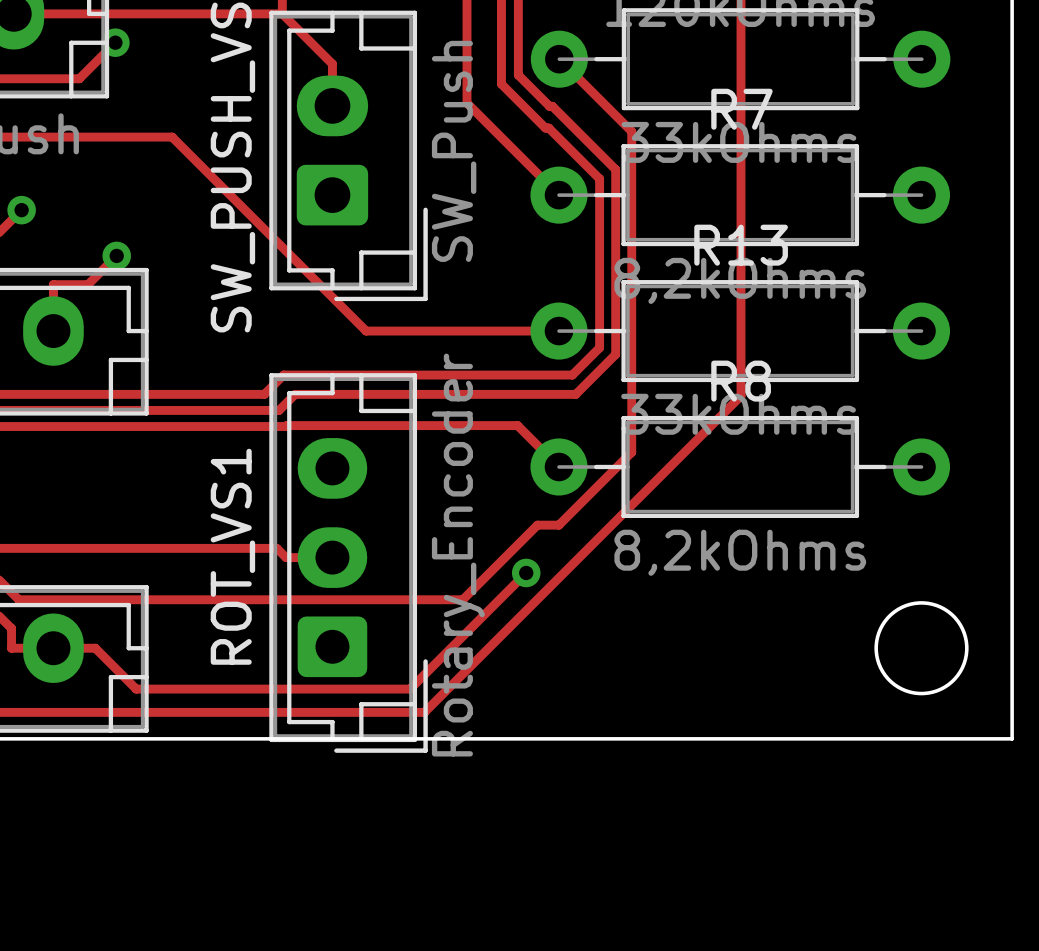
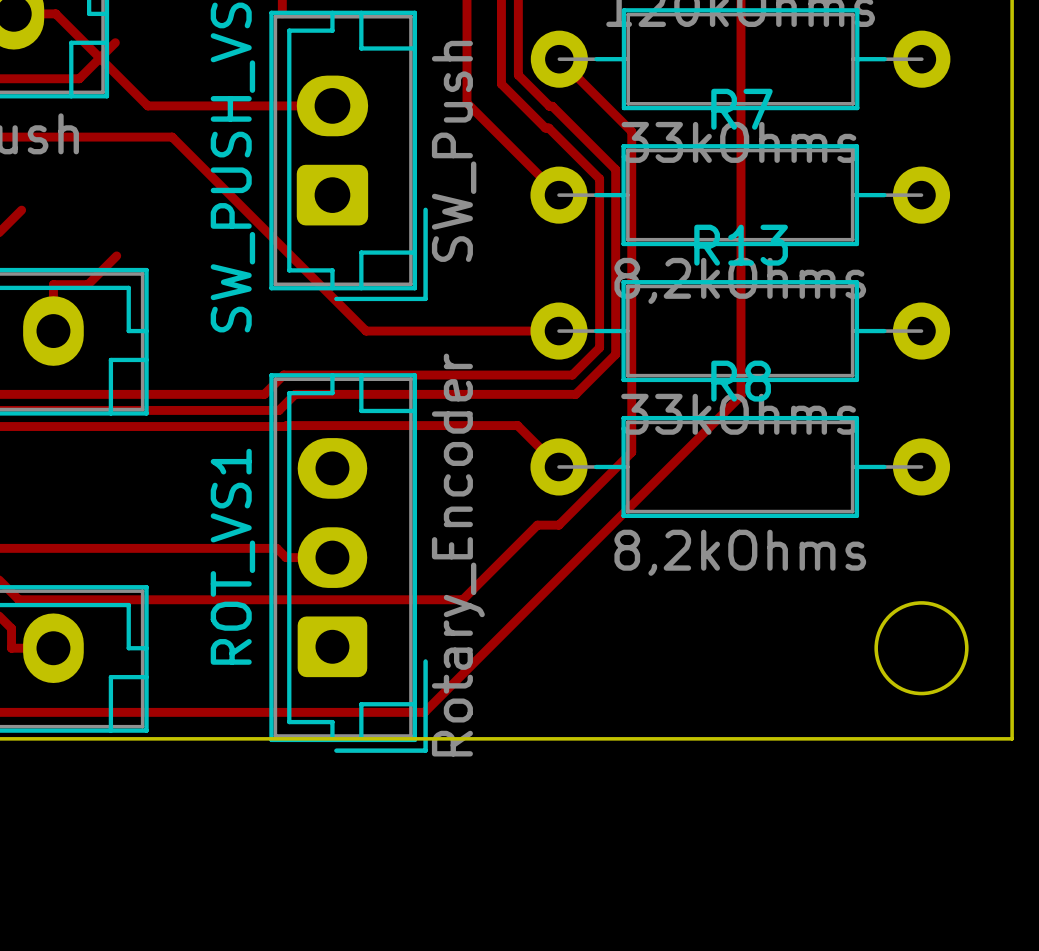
track: (55, 13) (282, 13) (332, 63) (332, 105) -> (55, 13) (147, 105) (332, 105)
via: (115, 42) -> none
via: (21, 210) -> none
via: (116, 255) -> none
track: (526, 572) (410, 689) (136, 689) (95, 648) (53, 648) -> none
via: (526, 572) -> none

